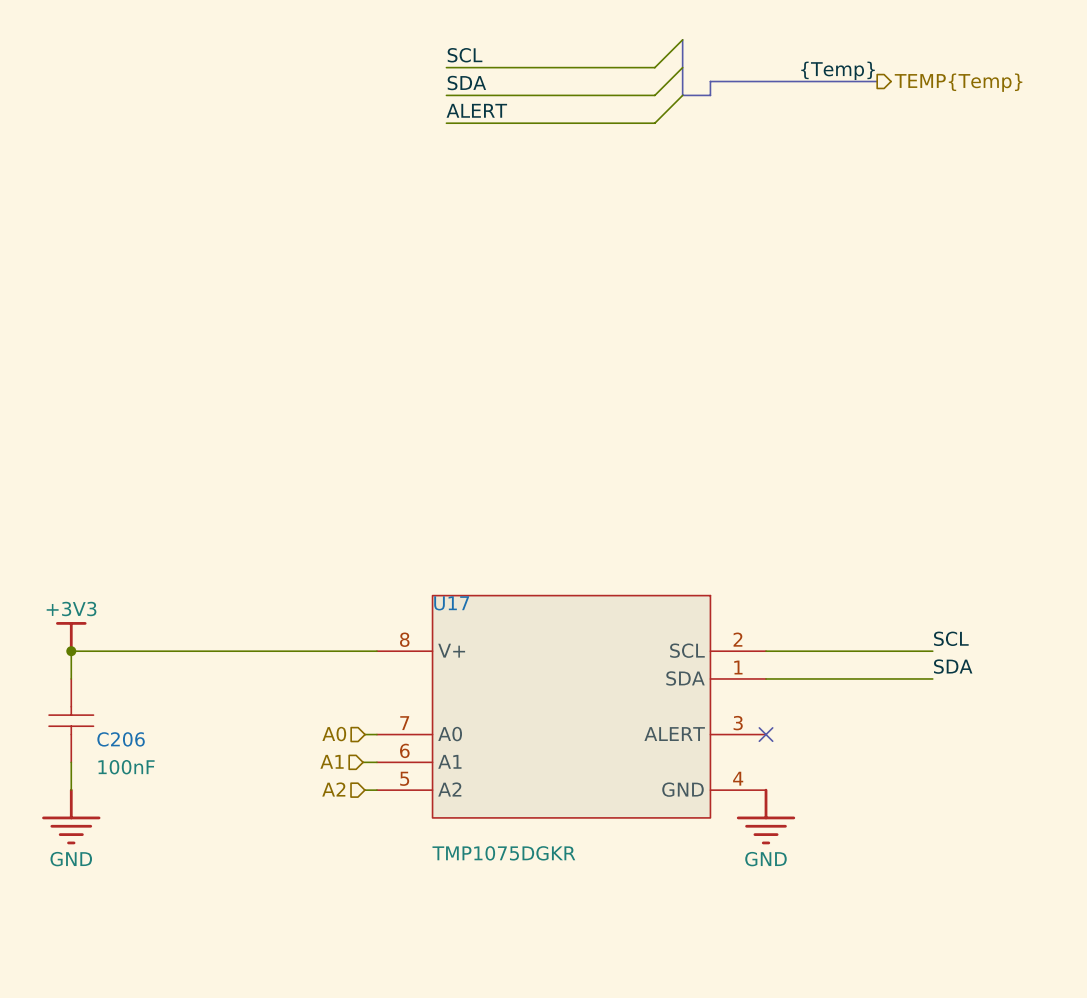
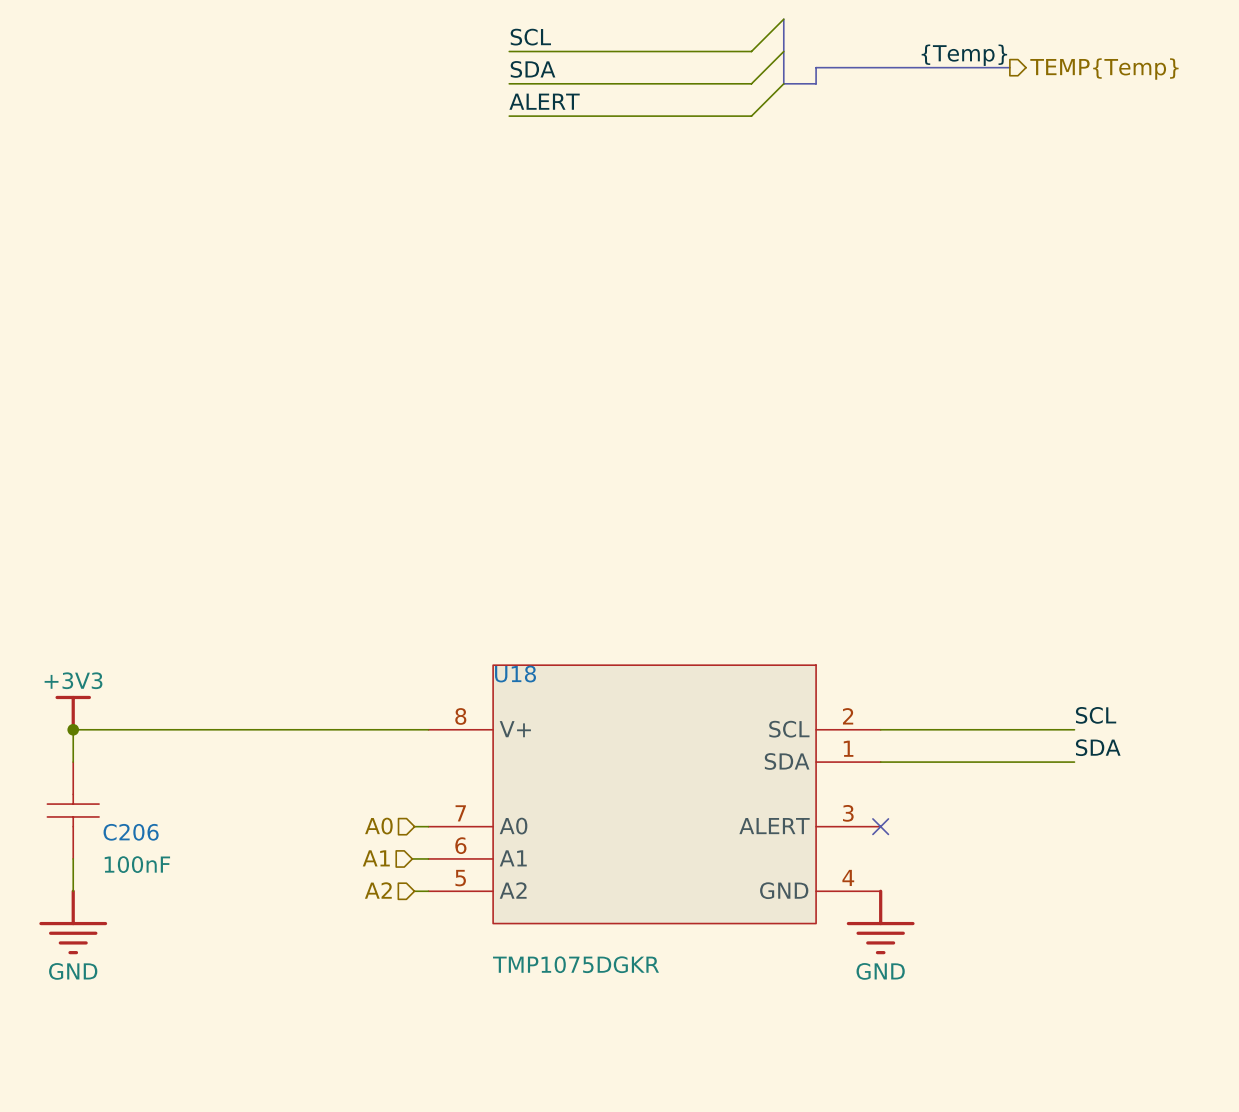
U17 name: U17 (451, 603) -> U18 (515, 674)

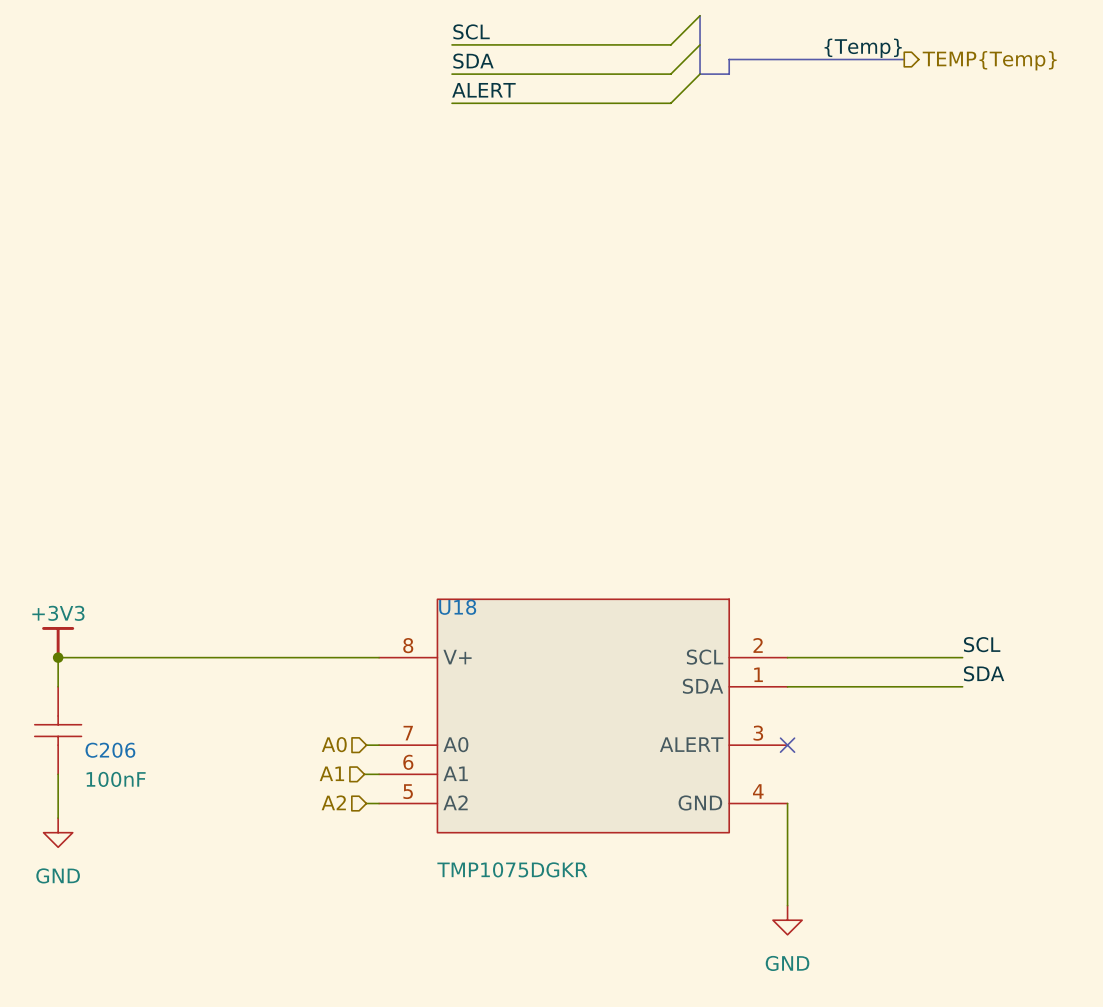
power symbol shape: [39, 889, 108, 955] -> [43, 818, 73, 848]
wire: none -> (787, 803) (787, 905)
power symbol: GND (880, 921) -> none
power symbol: none -> GND (787, 920)

